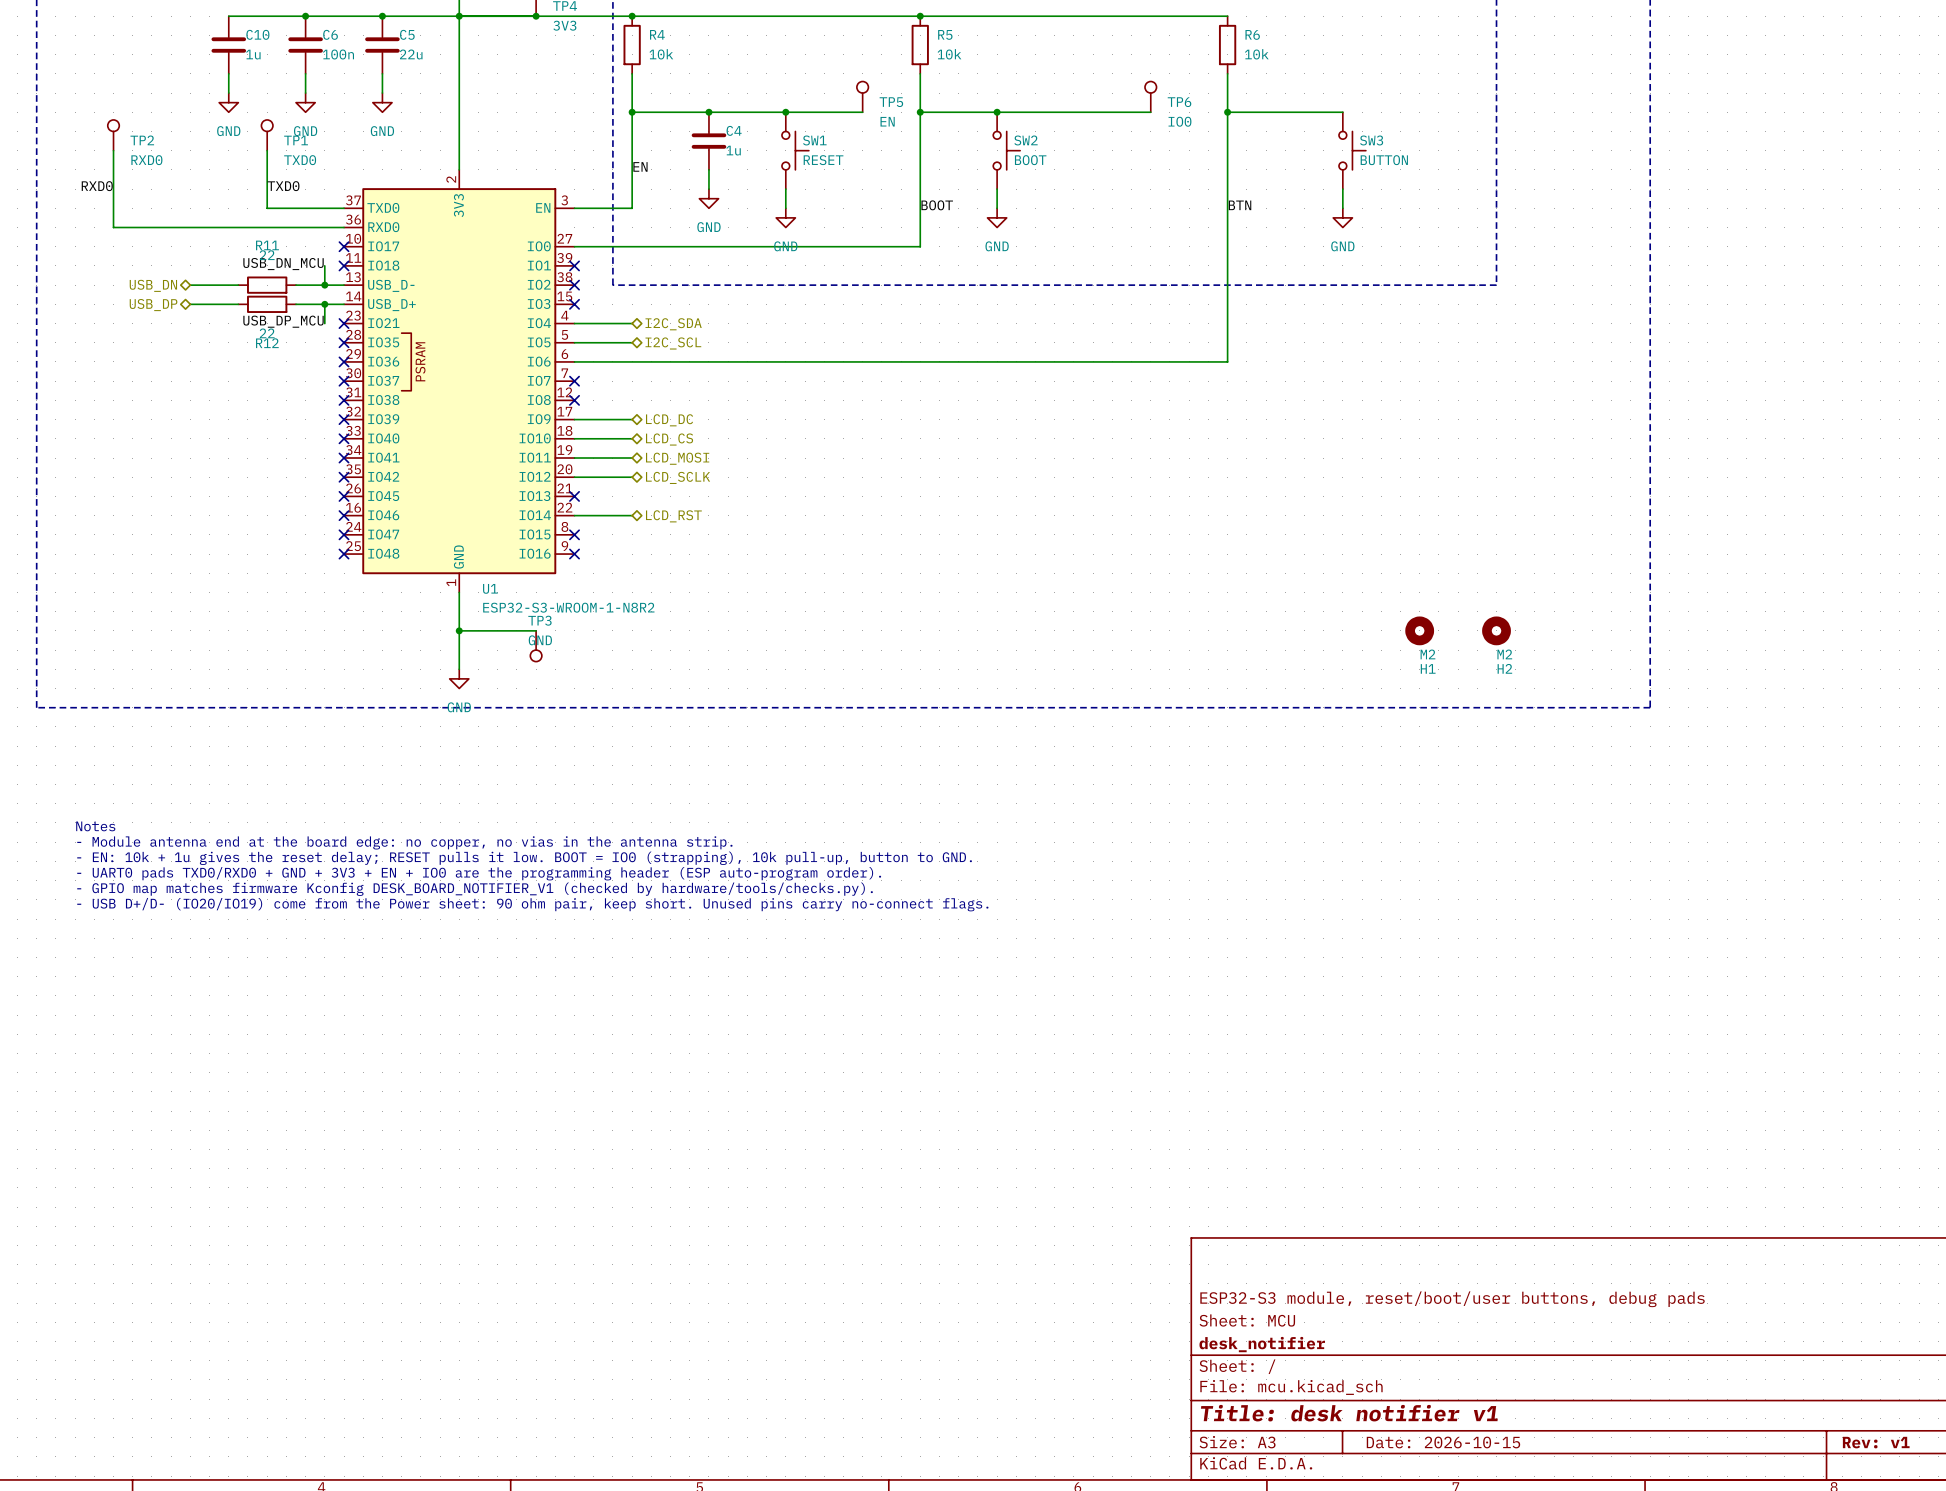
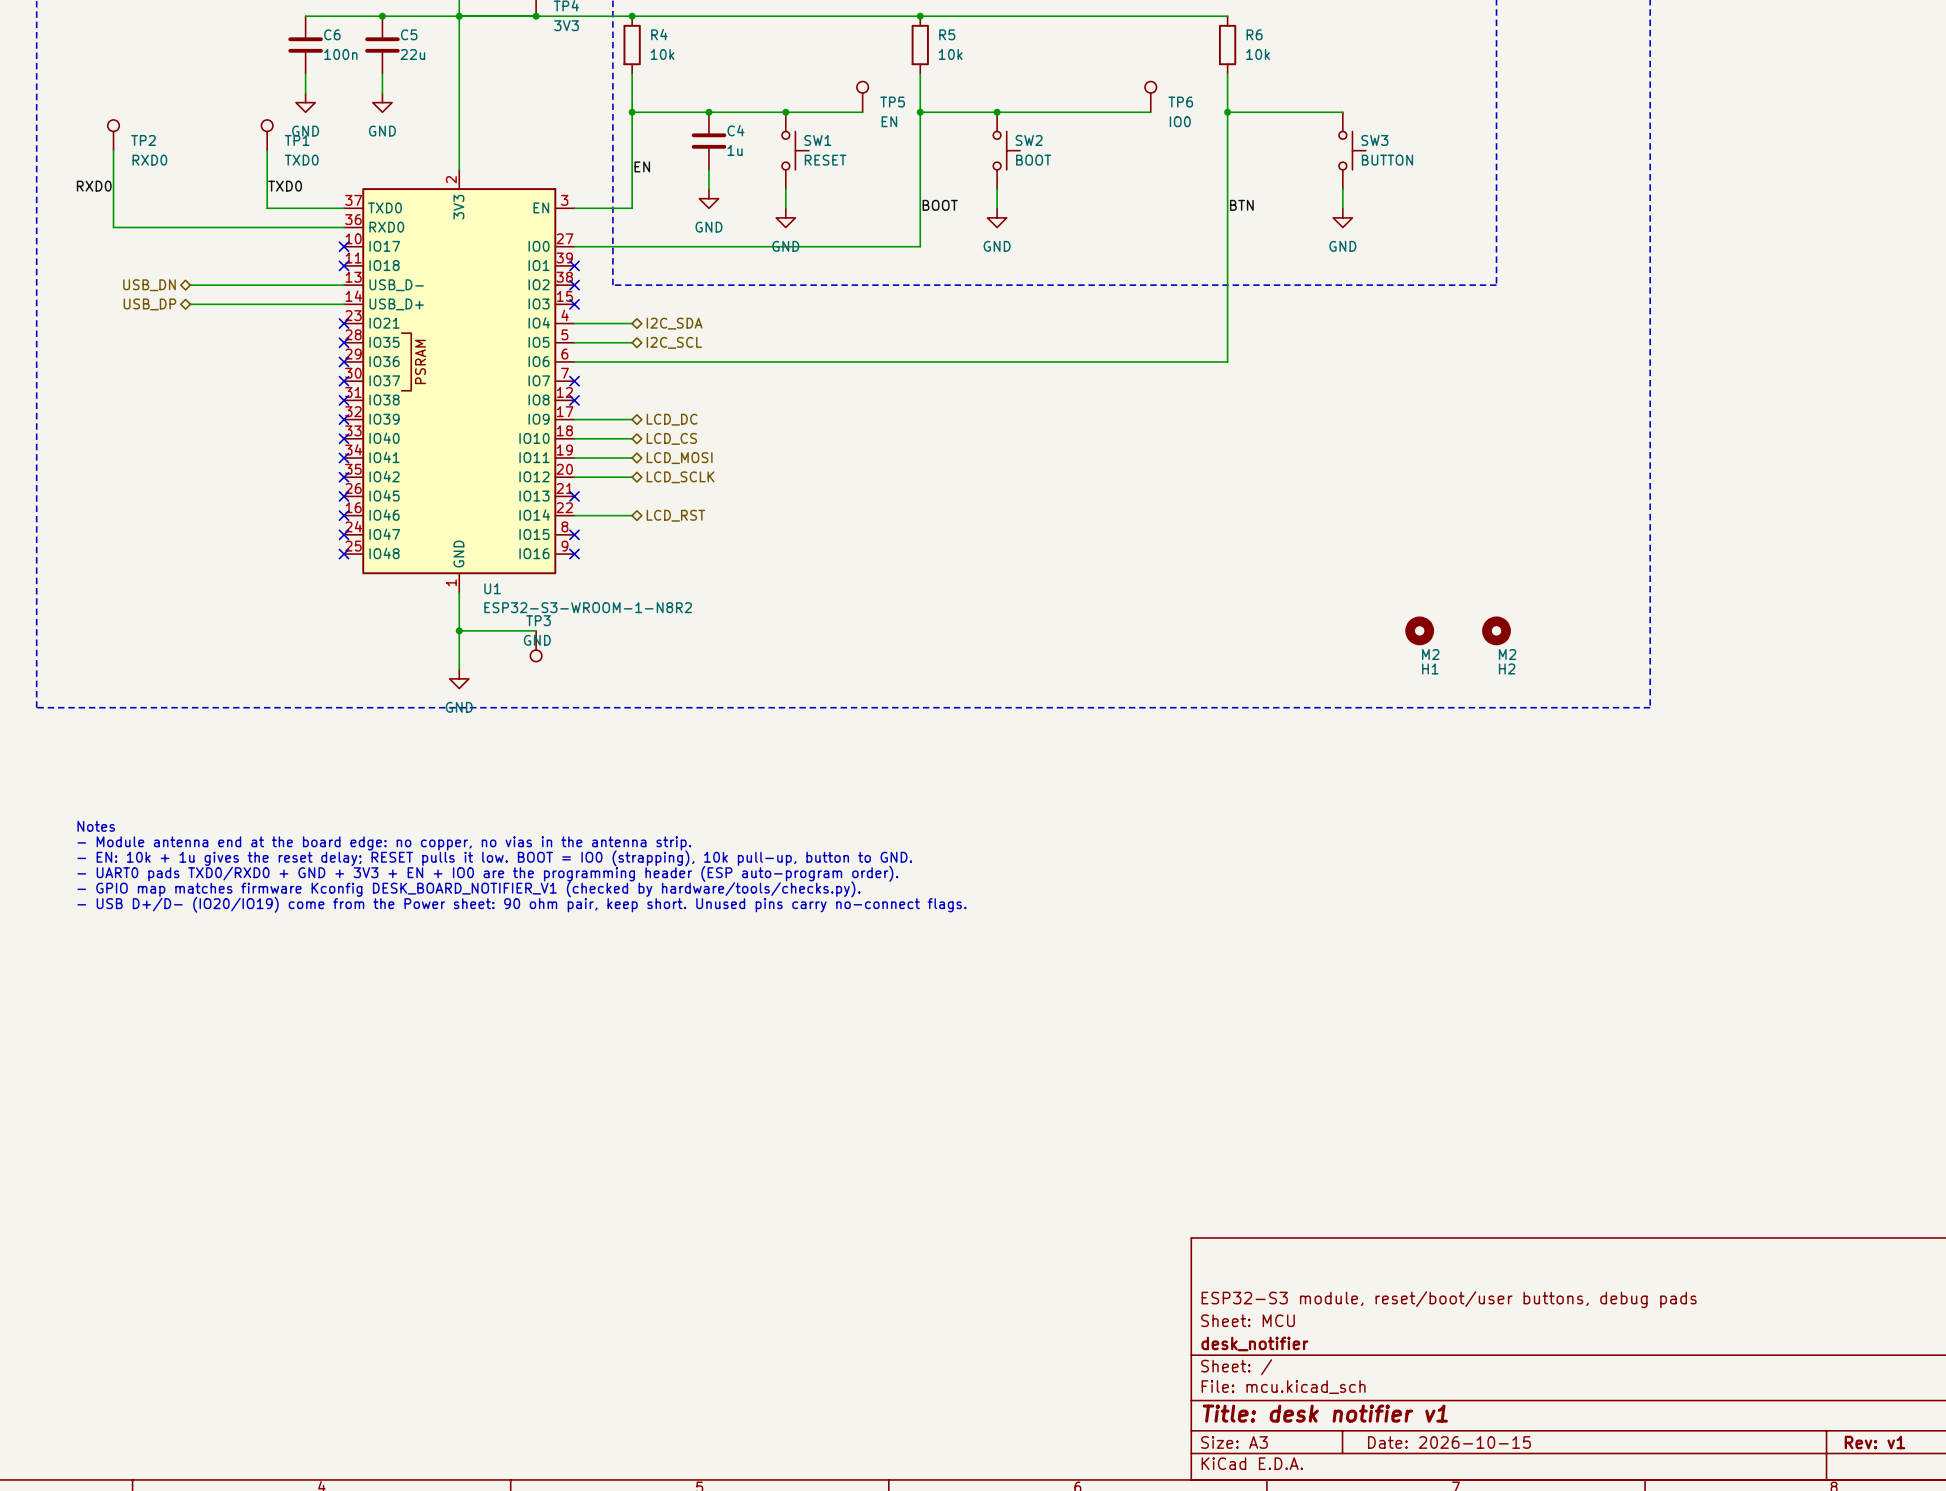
wire: (228, 16) (305, 16) -> none
junction: (305, 16) -> none
C10: 1u (228, 45) -> none
wire: (228, 73) (228, 93) -> none
power symbol: GND (228, 102) -> none
label: USB_DN_MCU (283, 264) -> none
wire: (324, 265) (324, 285) -> none
wire: none -> (238, 285) (296, 285)
R11: 22 (267, 285) -> none
junction: (324, 285) -> none
wire: none -> (238, 304) (296, 304)
R12: 22 (267, 304) -> none
wire: (324, 304) (324, 323) -> none
junction: (324, 304) -> none
label: USB_DP_MCU (283, 321) -> none

